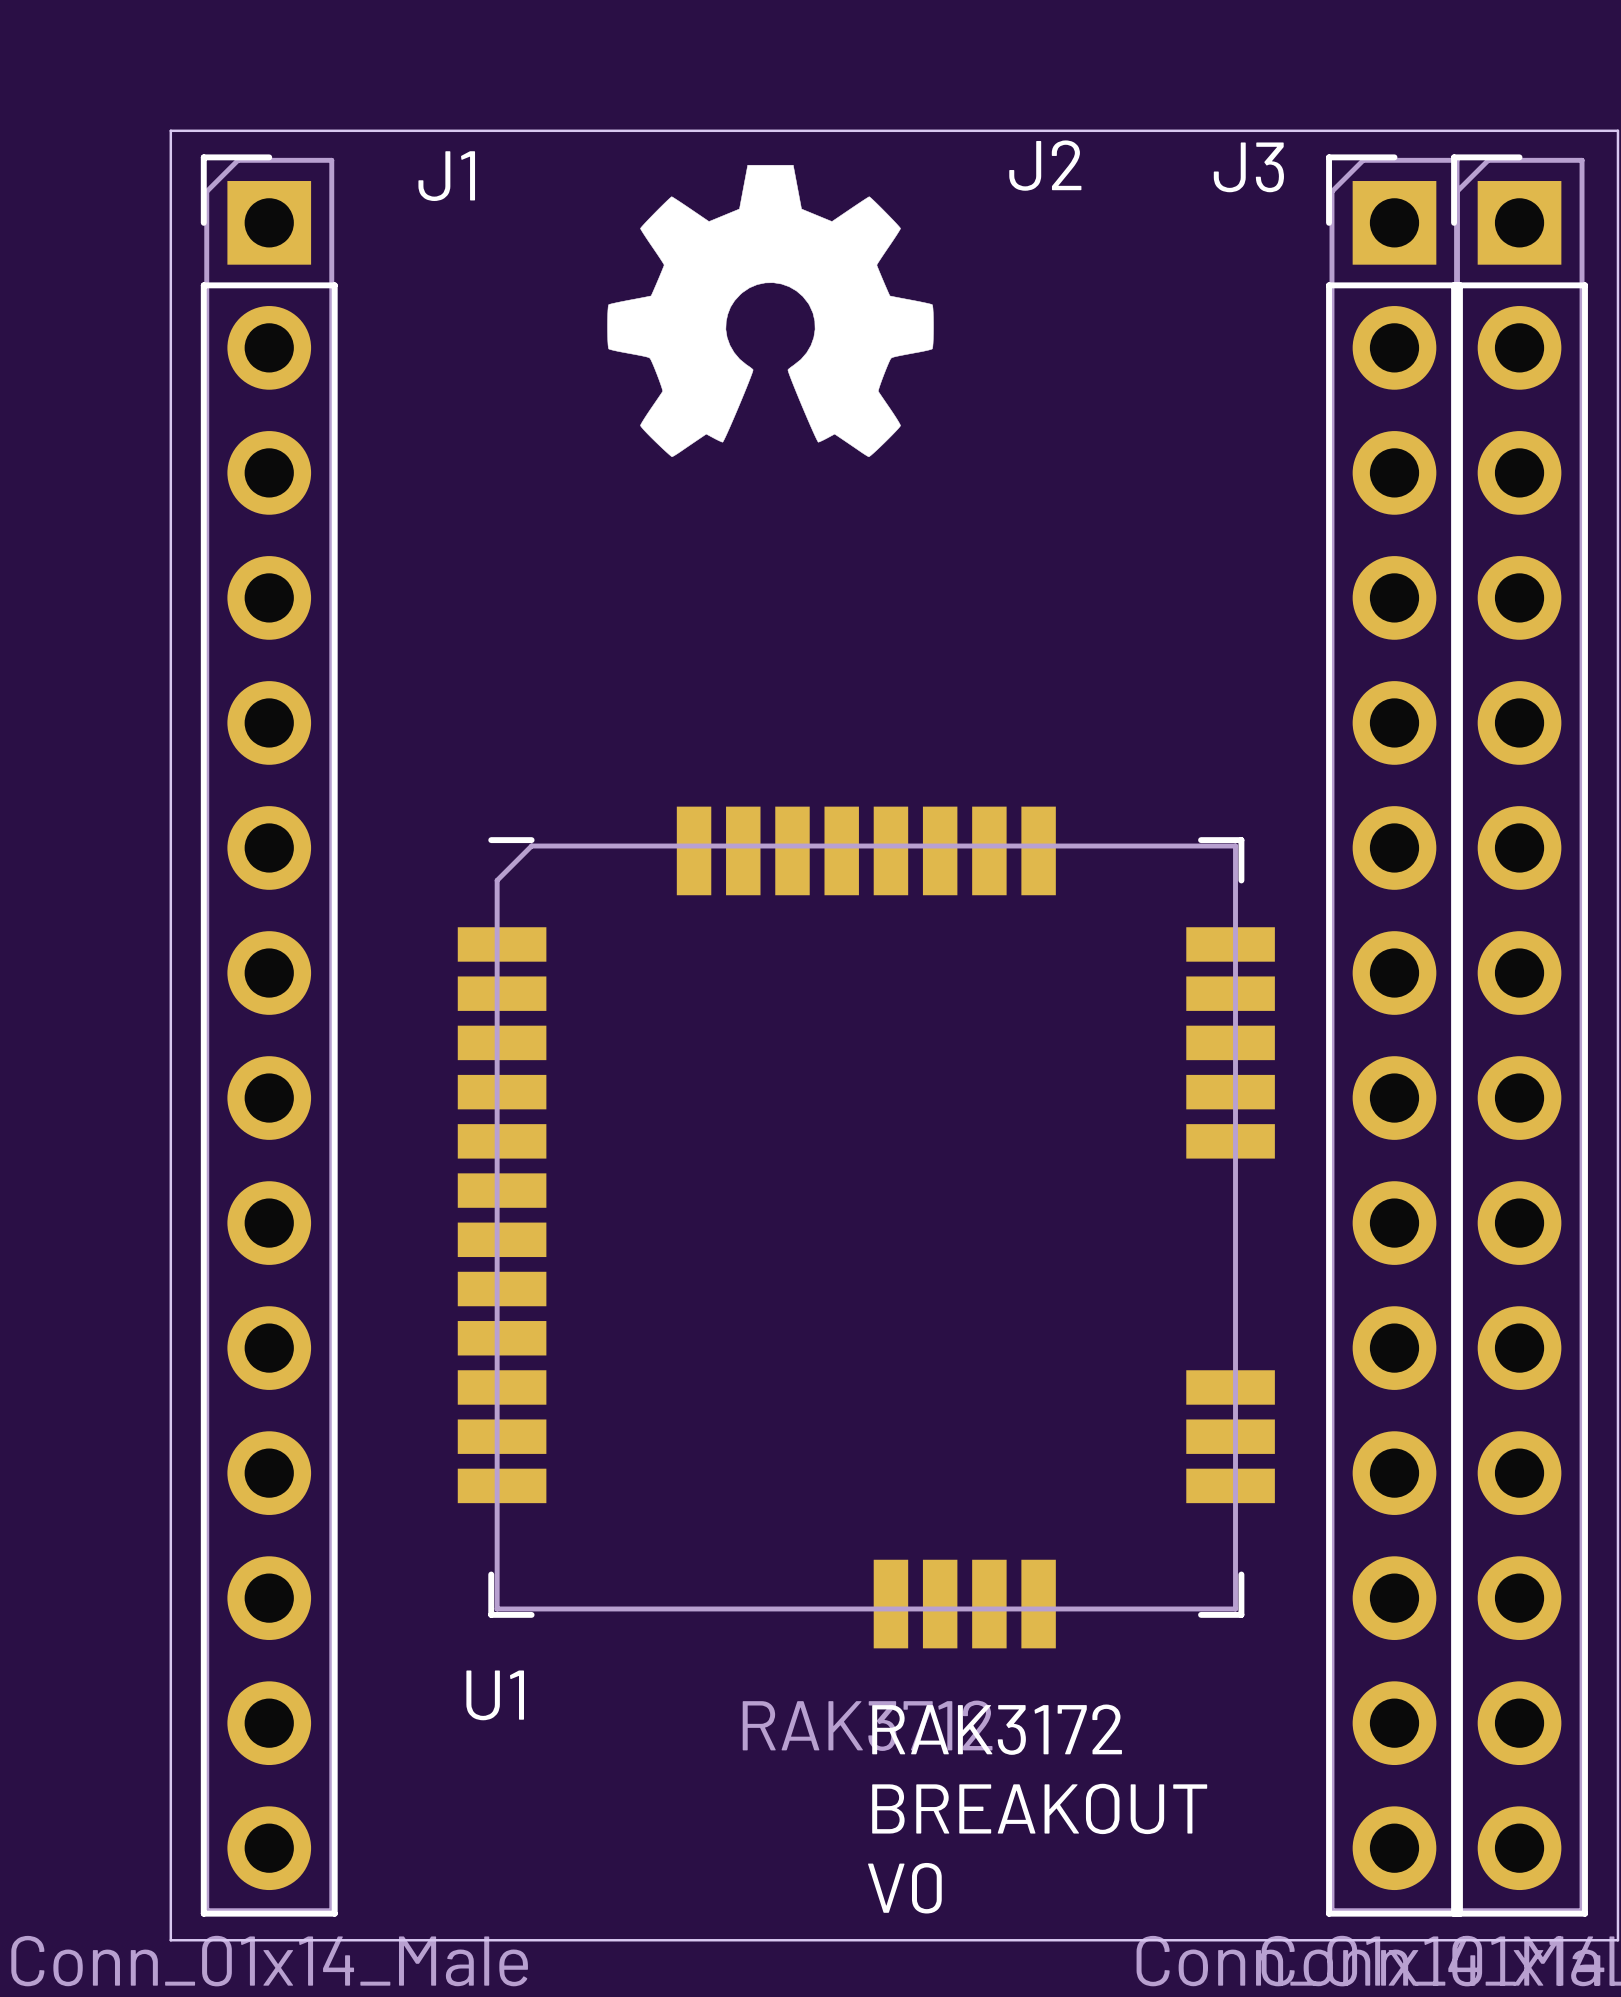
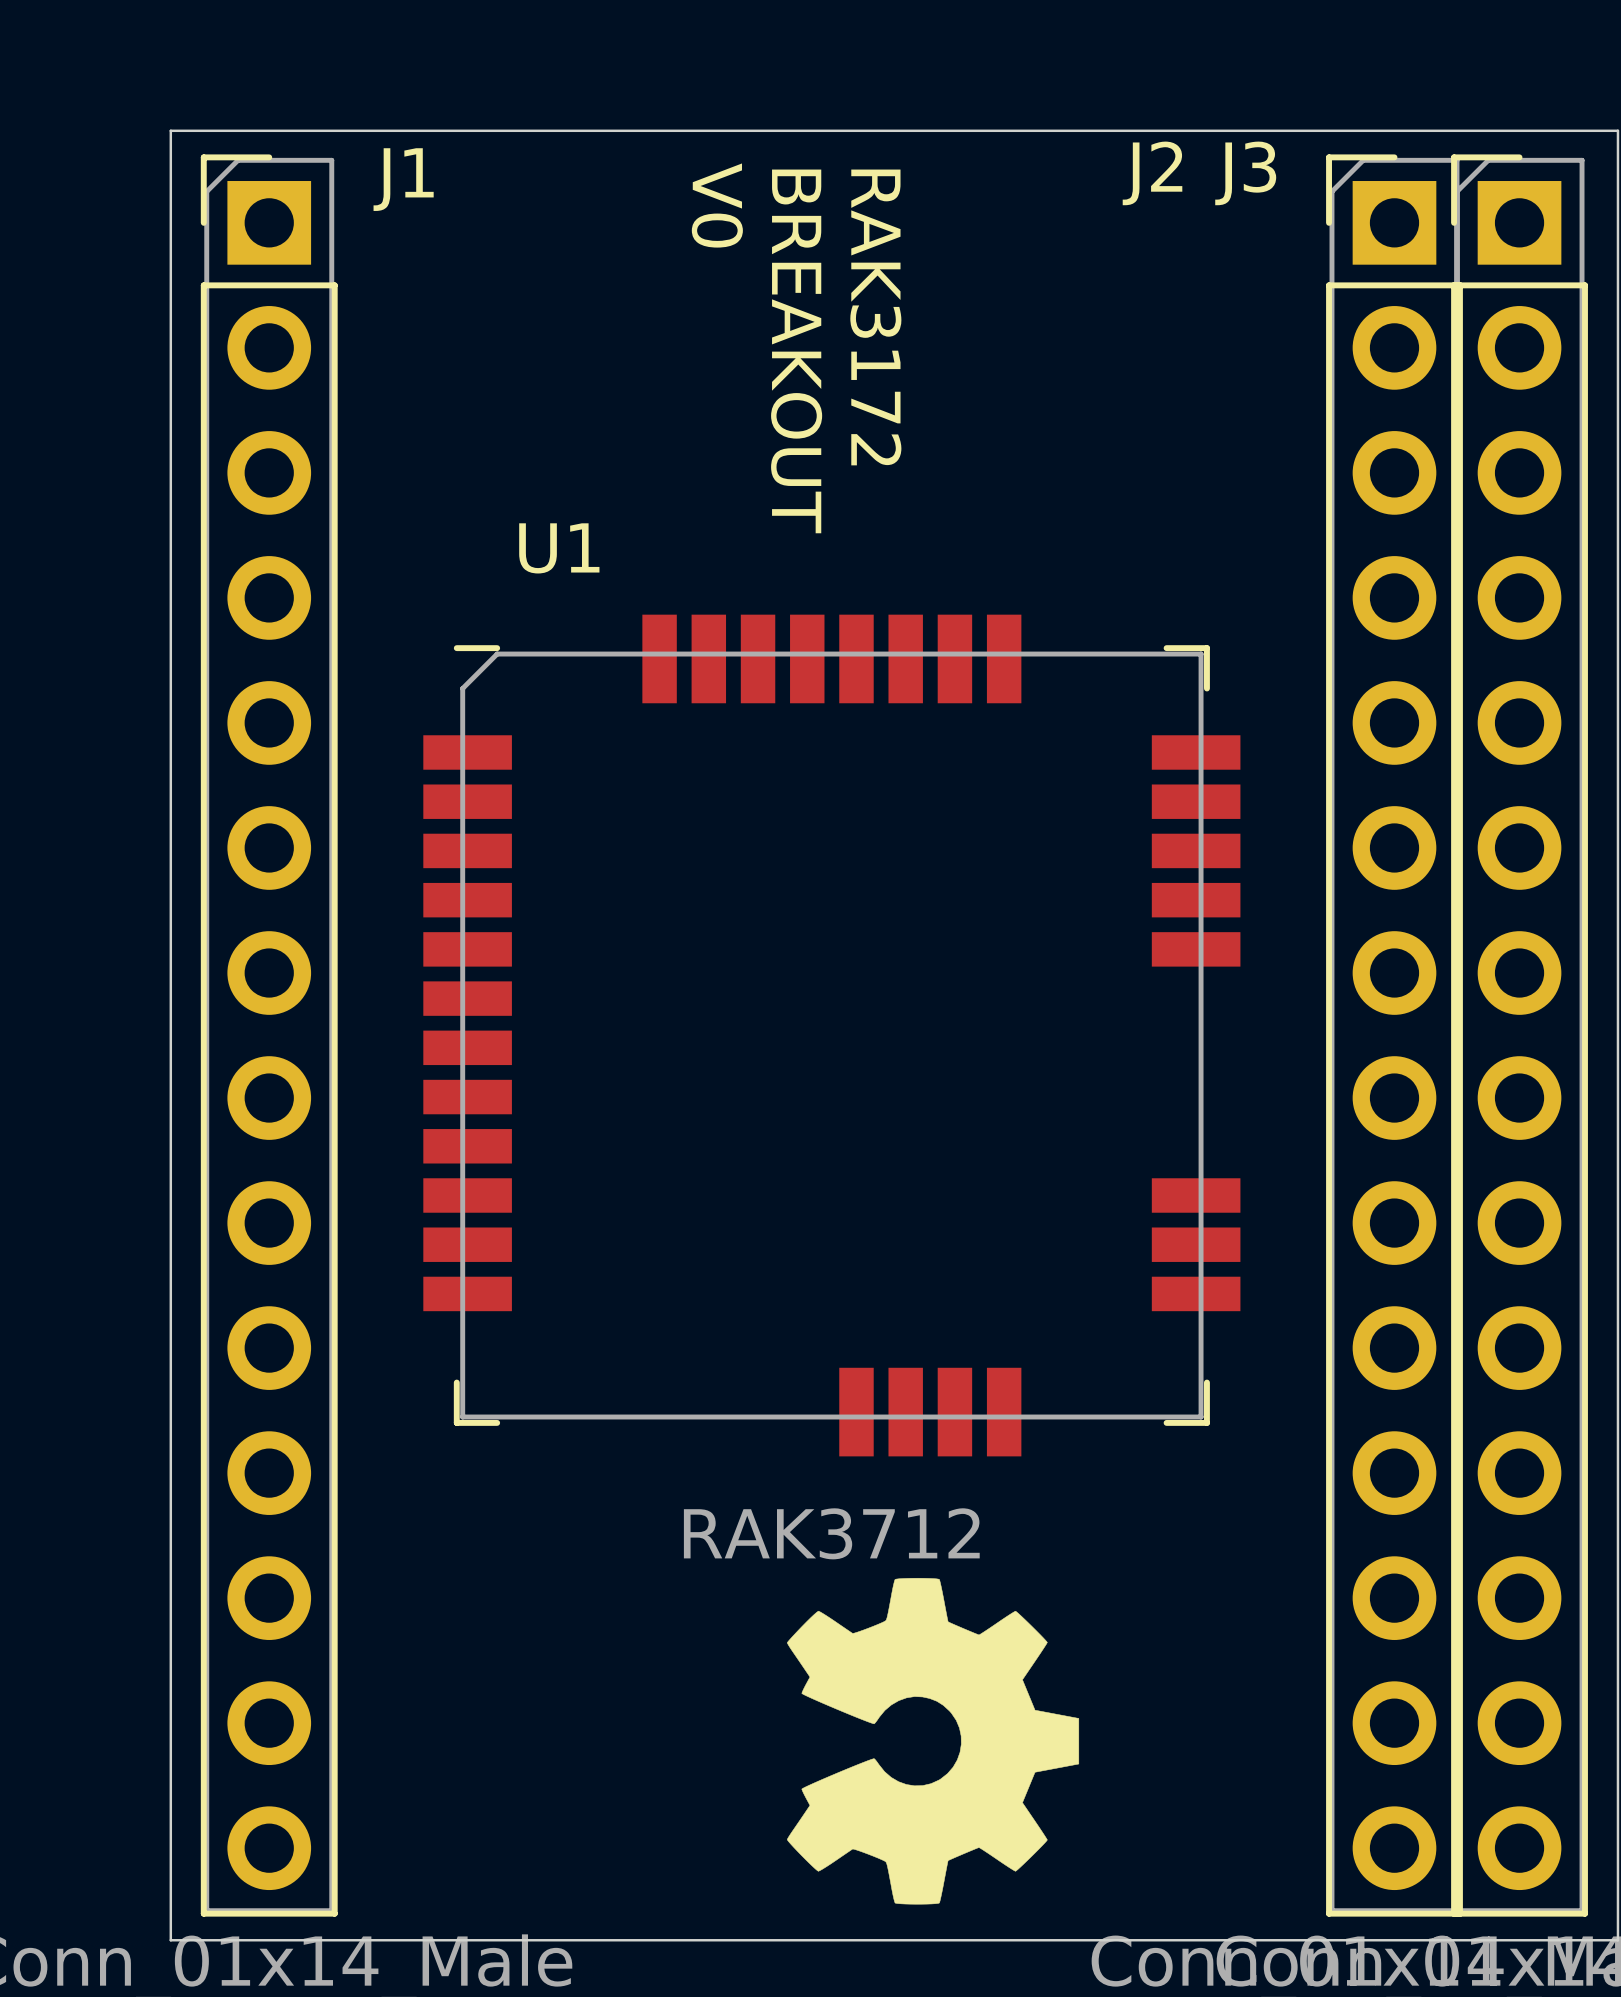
drawing: [607, 164, 934, 458] -> none
J2 name position: J2 (1045, 165) -> J2 (1152, 173)
J1 name position: J1 (446, 176) -> J1 (403, 179)
text: none -> V0 (717, 205)
text: none -> RAK3172 (875, 317)
text: none -> BREAKOUT (796, 351)
U1 position: (866, 1227) -> (831, 1035)
drawing: none -> [786, 1577, 1080, 1905]
U1 name position: U1 (495, 1695) -> U1 (559, 548)
text: RAK3172 (997, 1729) -> none
text: BREAKOUT (1039, 1808) -> none
text: V0 (904, 1888) -> none

